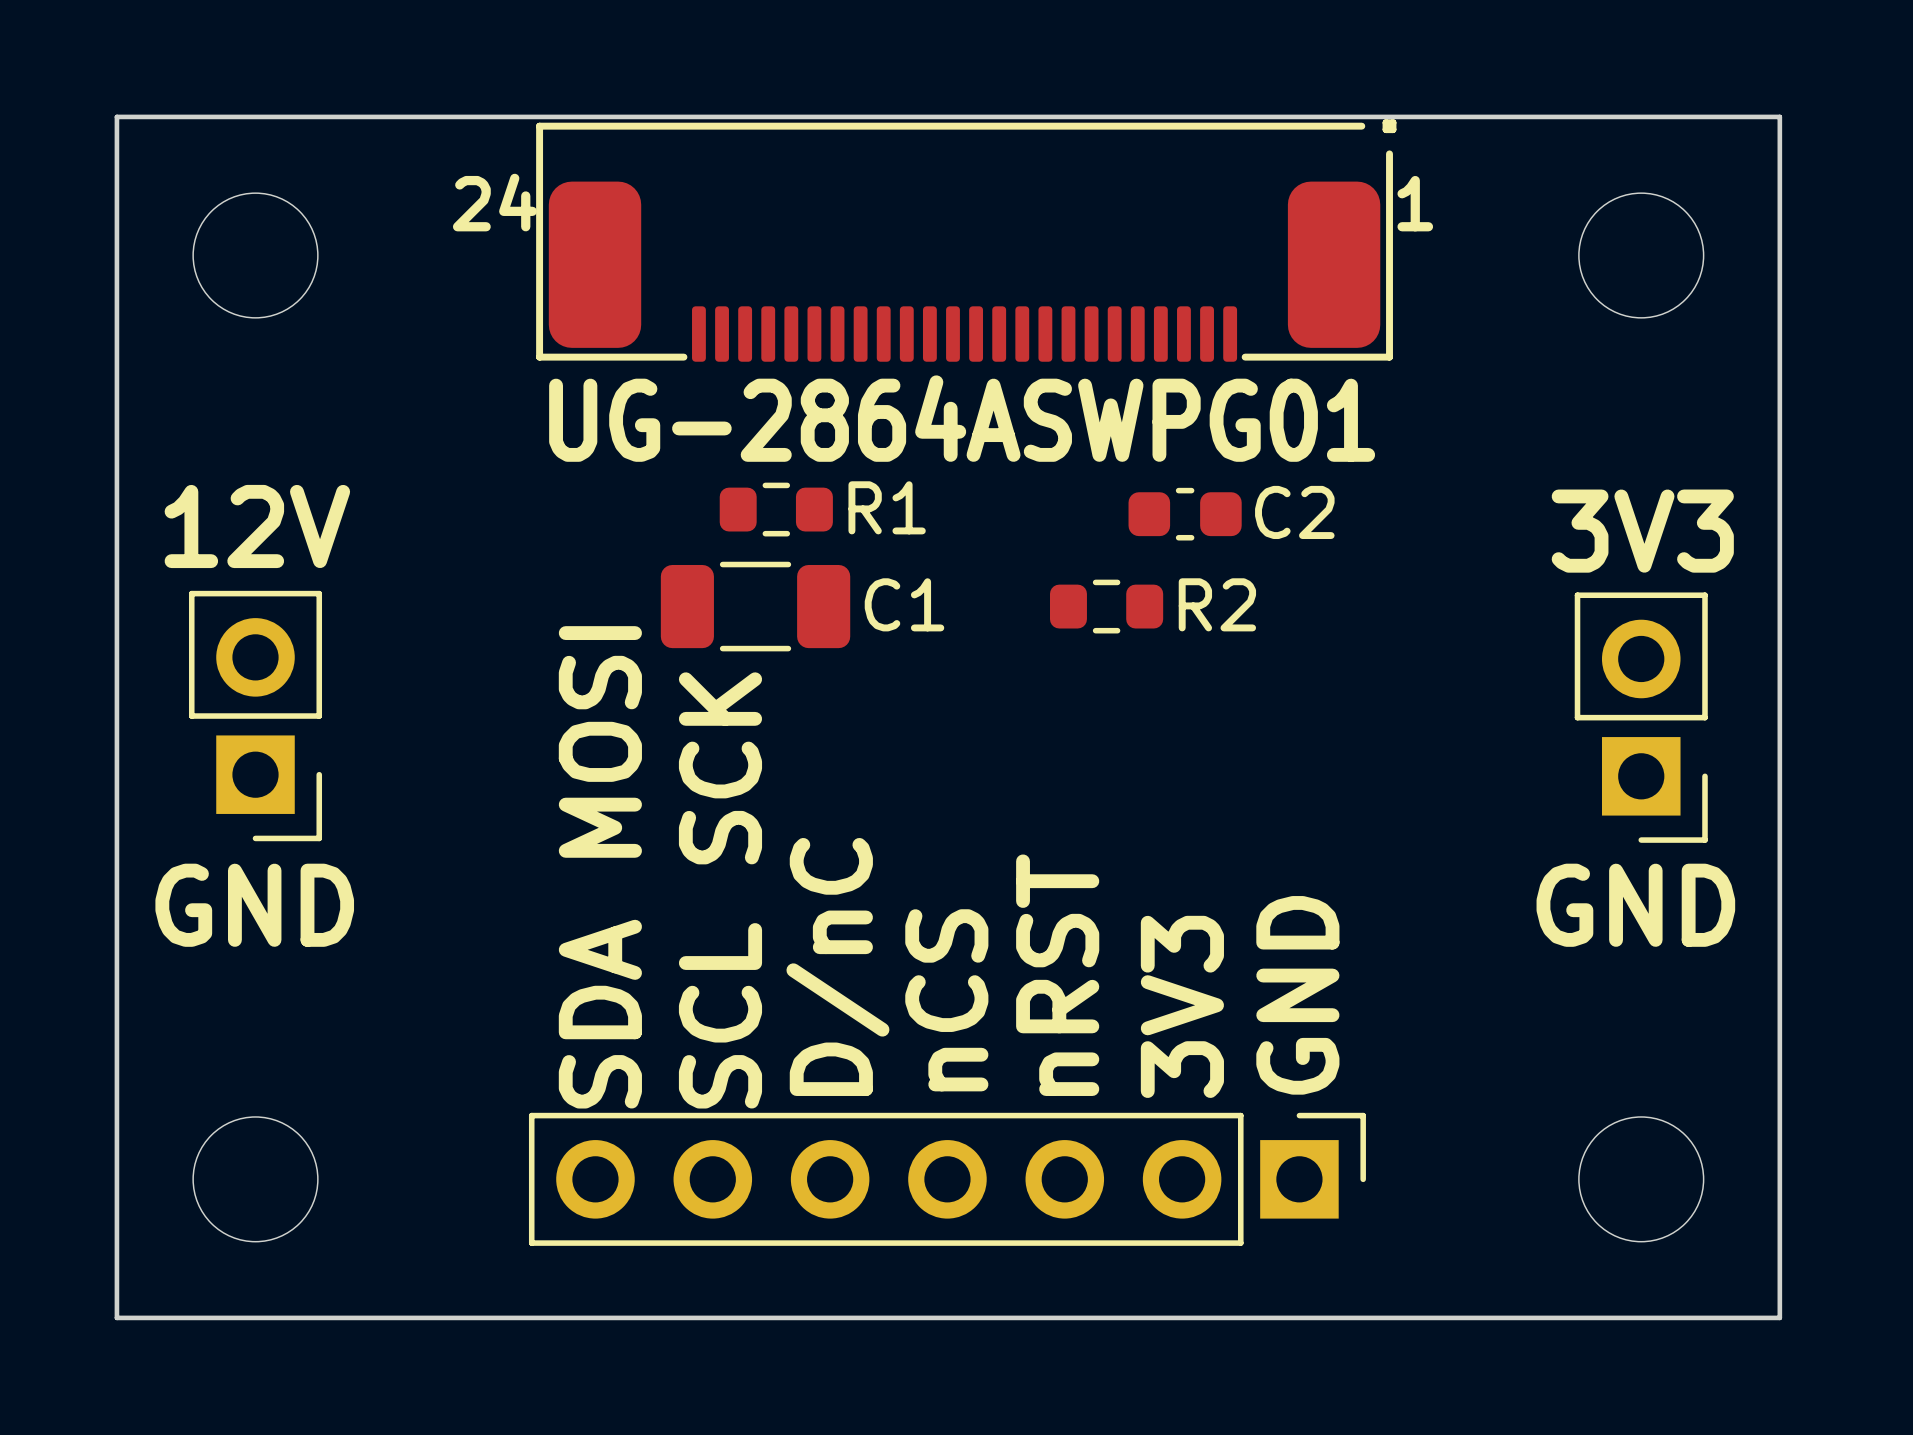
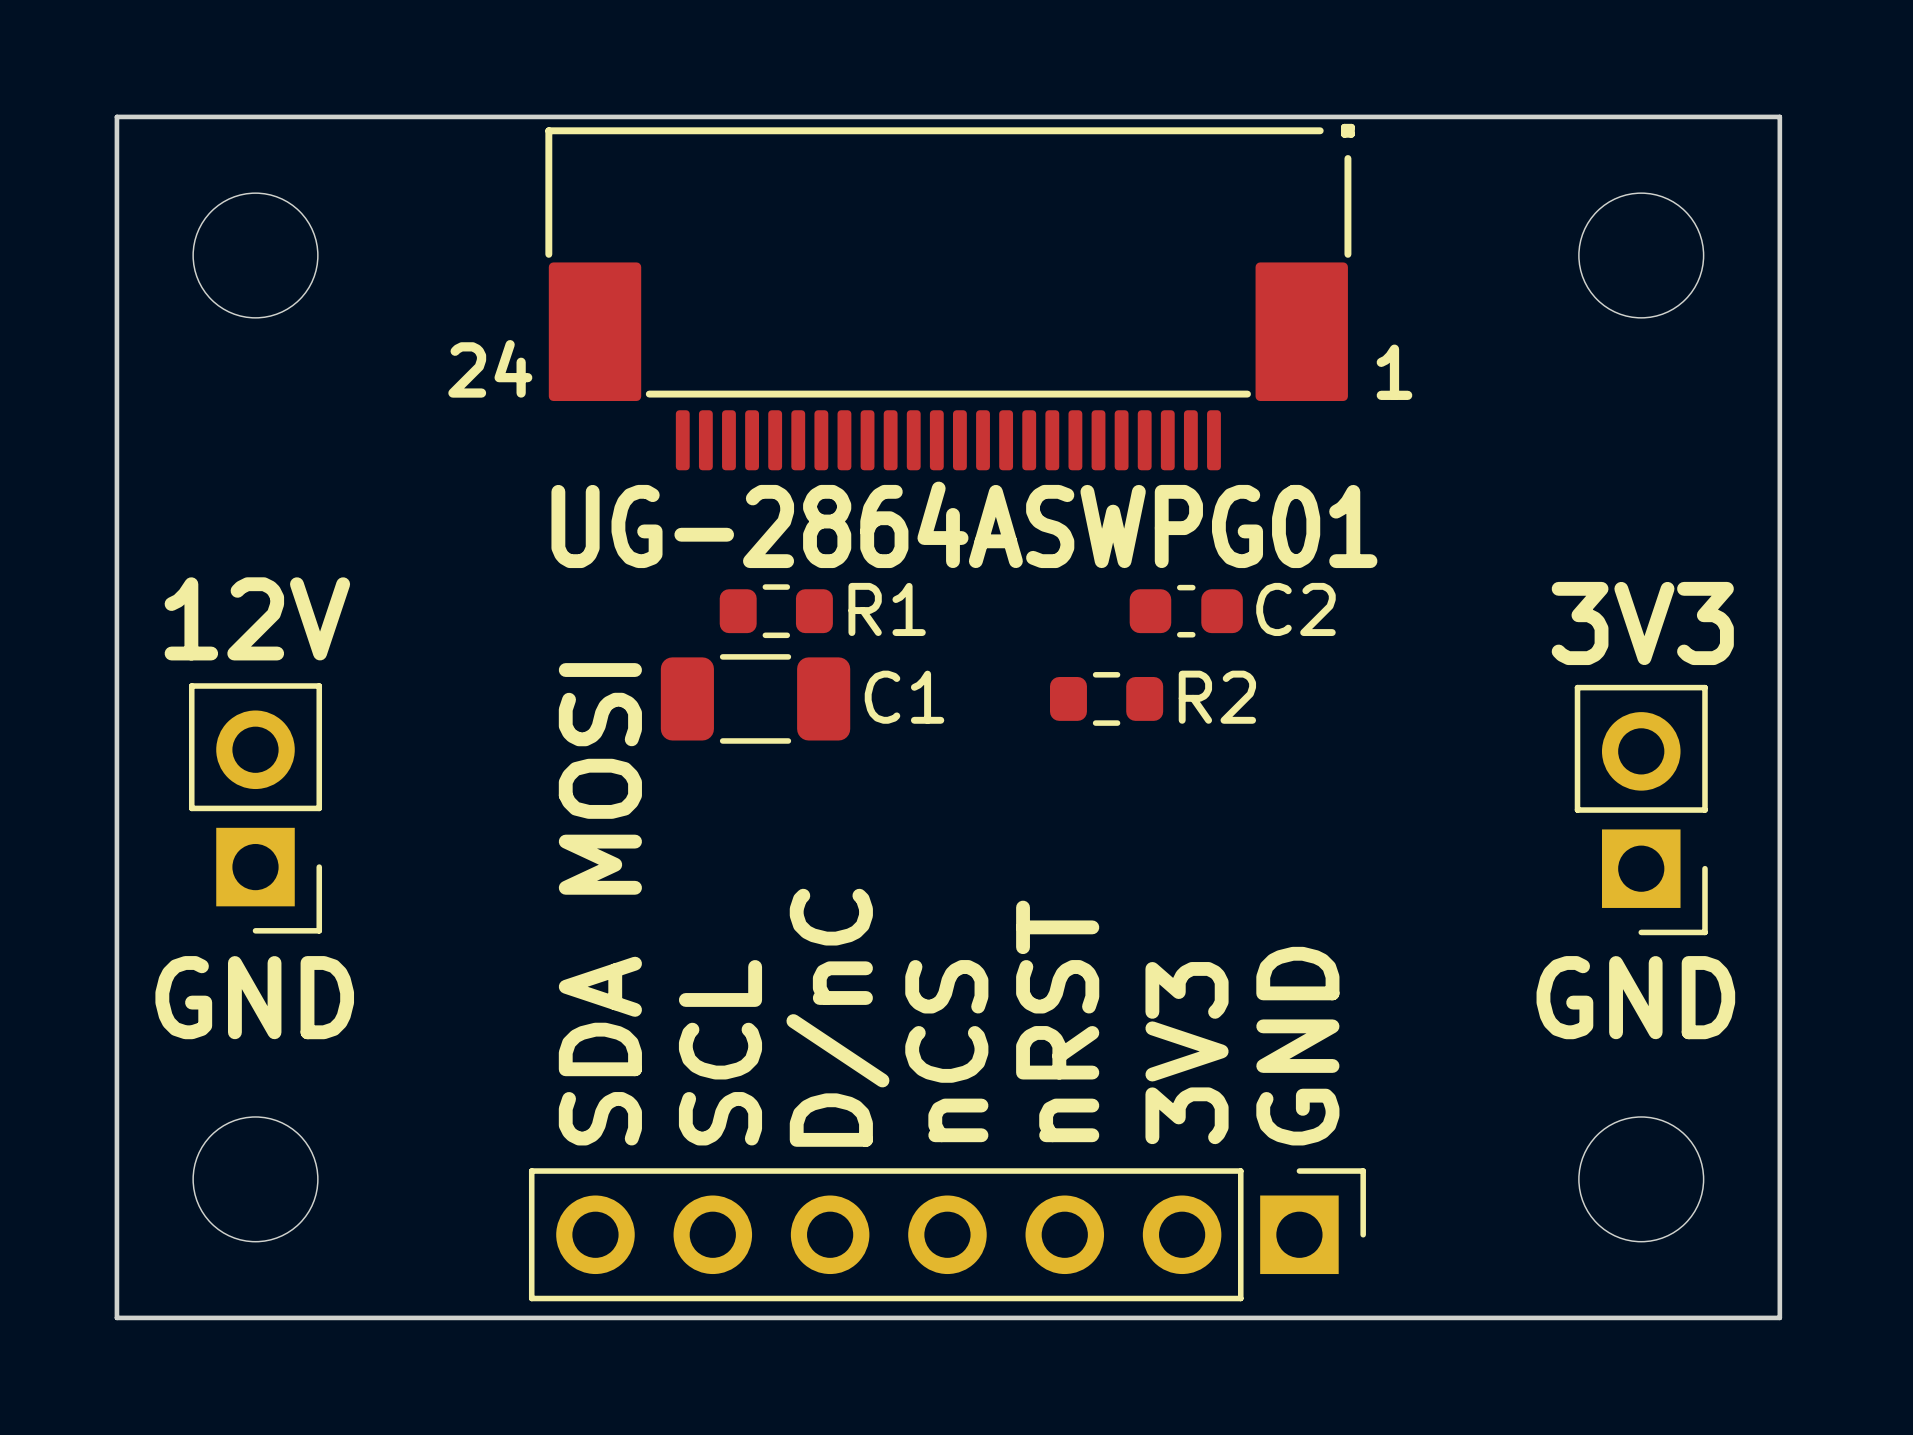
text position: 24 (494, 202) -> 24 (490, 368)
text position: 1 (1415, 203) -> 1 (1394, 372)
part: (966, 240) -> none
part: none -> (950, 297)
text position: UG-2864ASWPG01 (962, 418) -> UG-2864ASWPG01 (964, 524)
R1 position: (776, 509) -> (776, 611)
C2 position: (1185, 514) -> (1186, 611)
text position: 12V (257, 526) -> 12V (257, 618)
text position: 3V3 (1642, 531) -> 3V3 (1642, 623)
C1 position: (755, 606) -> (755, 698)
R2 position: (1106, 606) -> (1106, 698)
part position: (255, 716) -> (255, 808)
part position: (1641, 717) -> (1641, 810)
text position: SDA MOSI (600, 867) -> SDA MOSI (600, 904)
text: SCL SCK (720, 890) -> SCL (720, 1052)
text position: GND (254, 905) -> GND (254, 997)
text position: GND (1635, 905) -> GND (1635, 997)
text position: D/nC (837, 966) -> D/nC (837, 1017)
text position: nRST (1057, 975) -> nRST (1057, 1021)
text position: GND (1297, 995) -> GND (1297, 1046)
text position: nCS (946, 1000) -> nCS (946, 1051)
text position: 3V3 (1182, 1006) -> 3V3 (1187, 1053)
part position: (947, 1179) -> (947, 1234)

